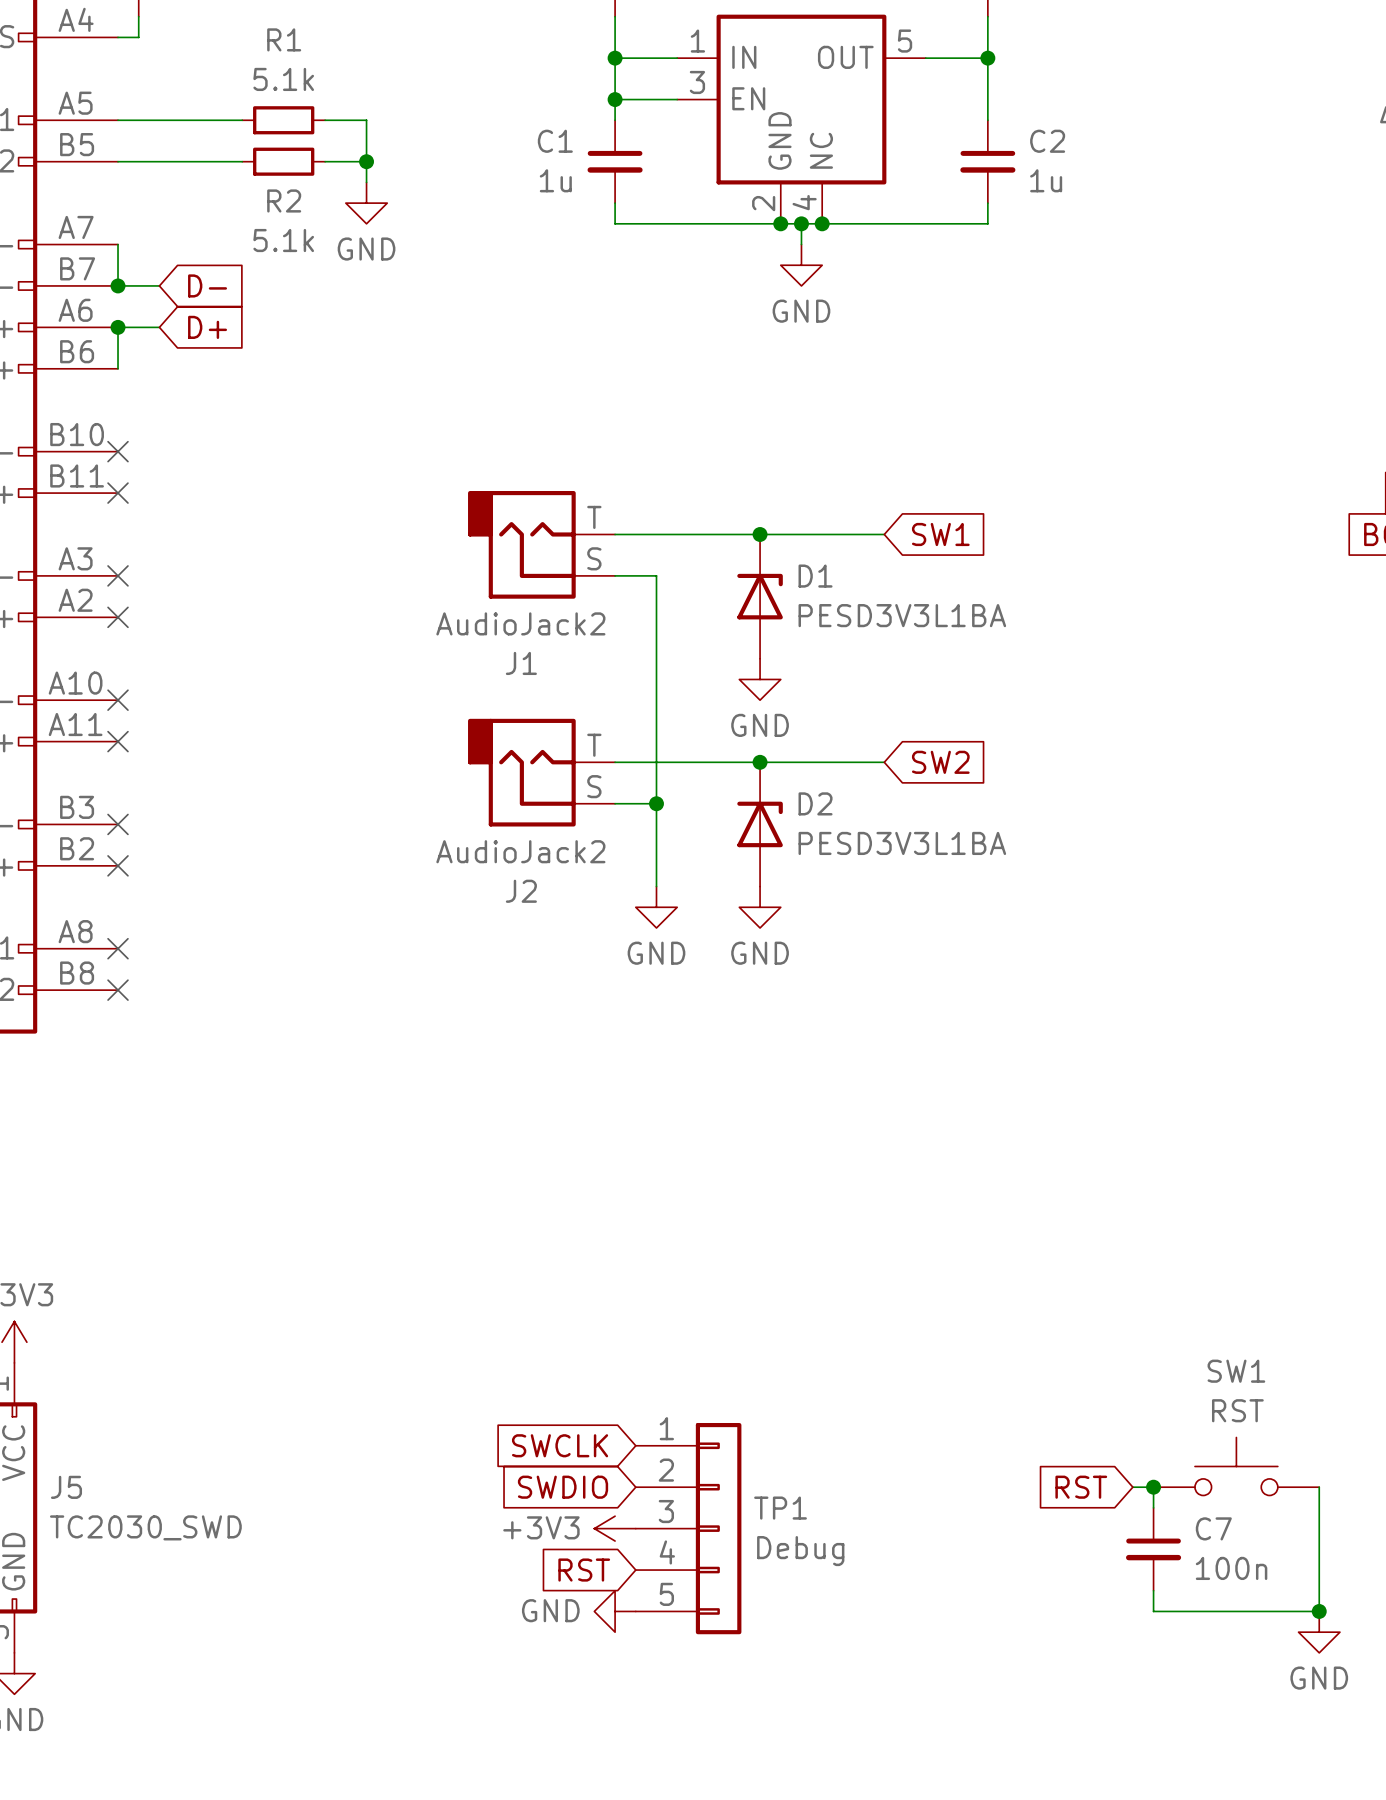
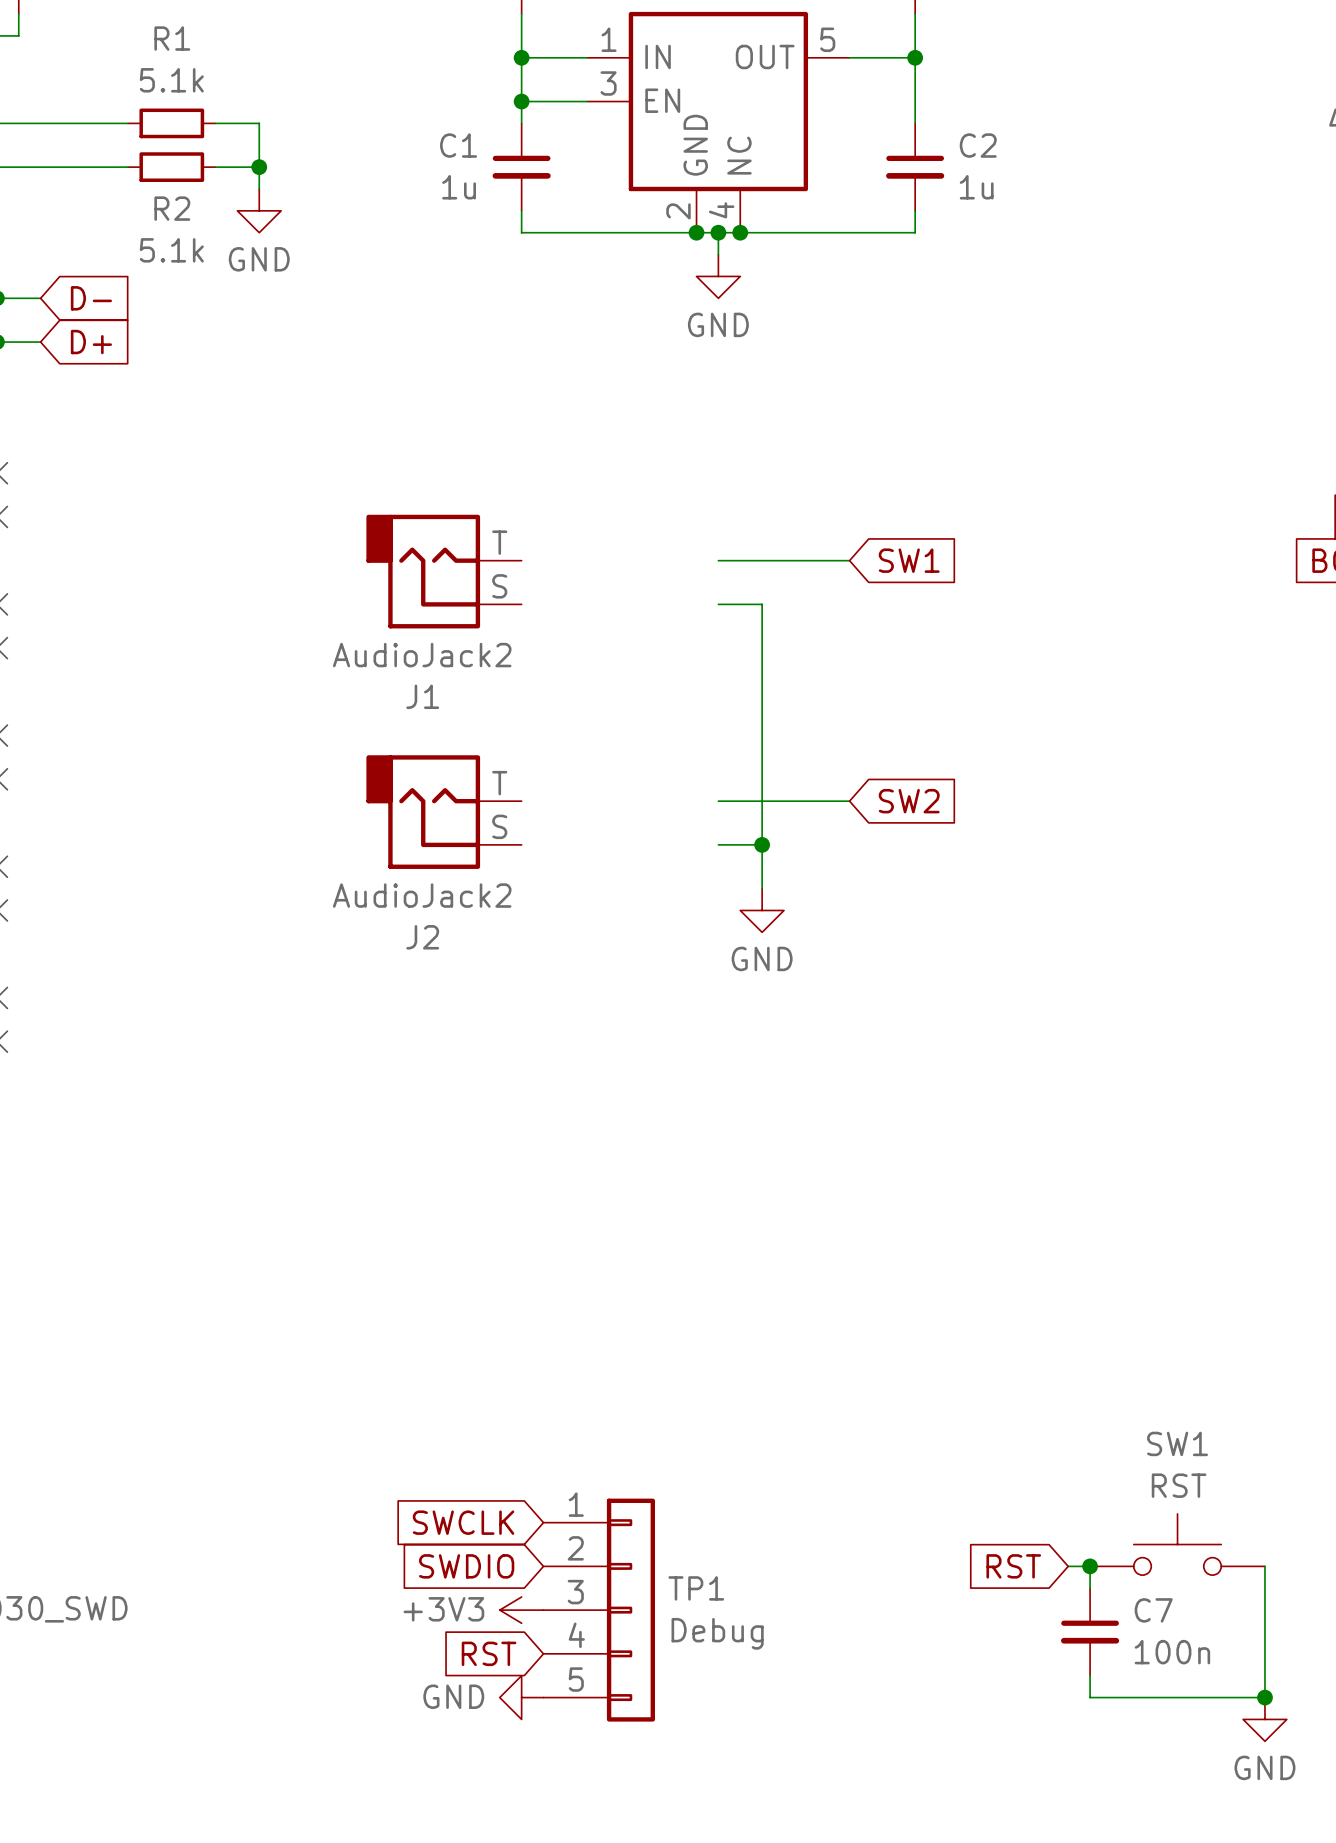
wire: (615, 534) (801, 534) -> none
junction: (760, 534) -> none
wire: none -> (805, 560) (849, 560)
global label position: SW1 (940, 534) -> SW1 (909, 560)
wire: (615, 575) (656, 575) (656, 886) -> none
wire: none -> (718, 604) (762, 604) (762, 888)
D1: PESD3V3L1BA (760, 596) -> none
power symbol: GND (760, 679) -> none
wire: (615, 762) (801, 762) -> none
junction position: (760, 762) -> (762, 844)
wire: none -> (805, 801) (849, 801)
global label position: SW2 (940, 762) -> SW2 (909, 801)
wire: (615, 803) (656, 803) -> (718, 844) (762, 844)
junction: (656, 803) -> none
D2: PESD3V3L1BA (760, 824) -> none
power symbol: GND (656, 907) -> none
power symbol position: GND (760, 907) -> GND (762, 910)

